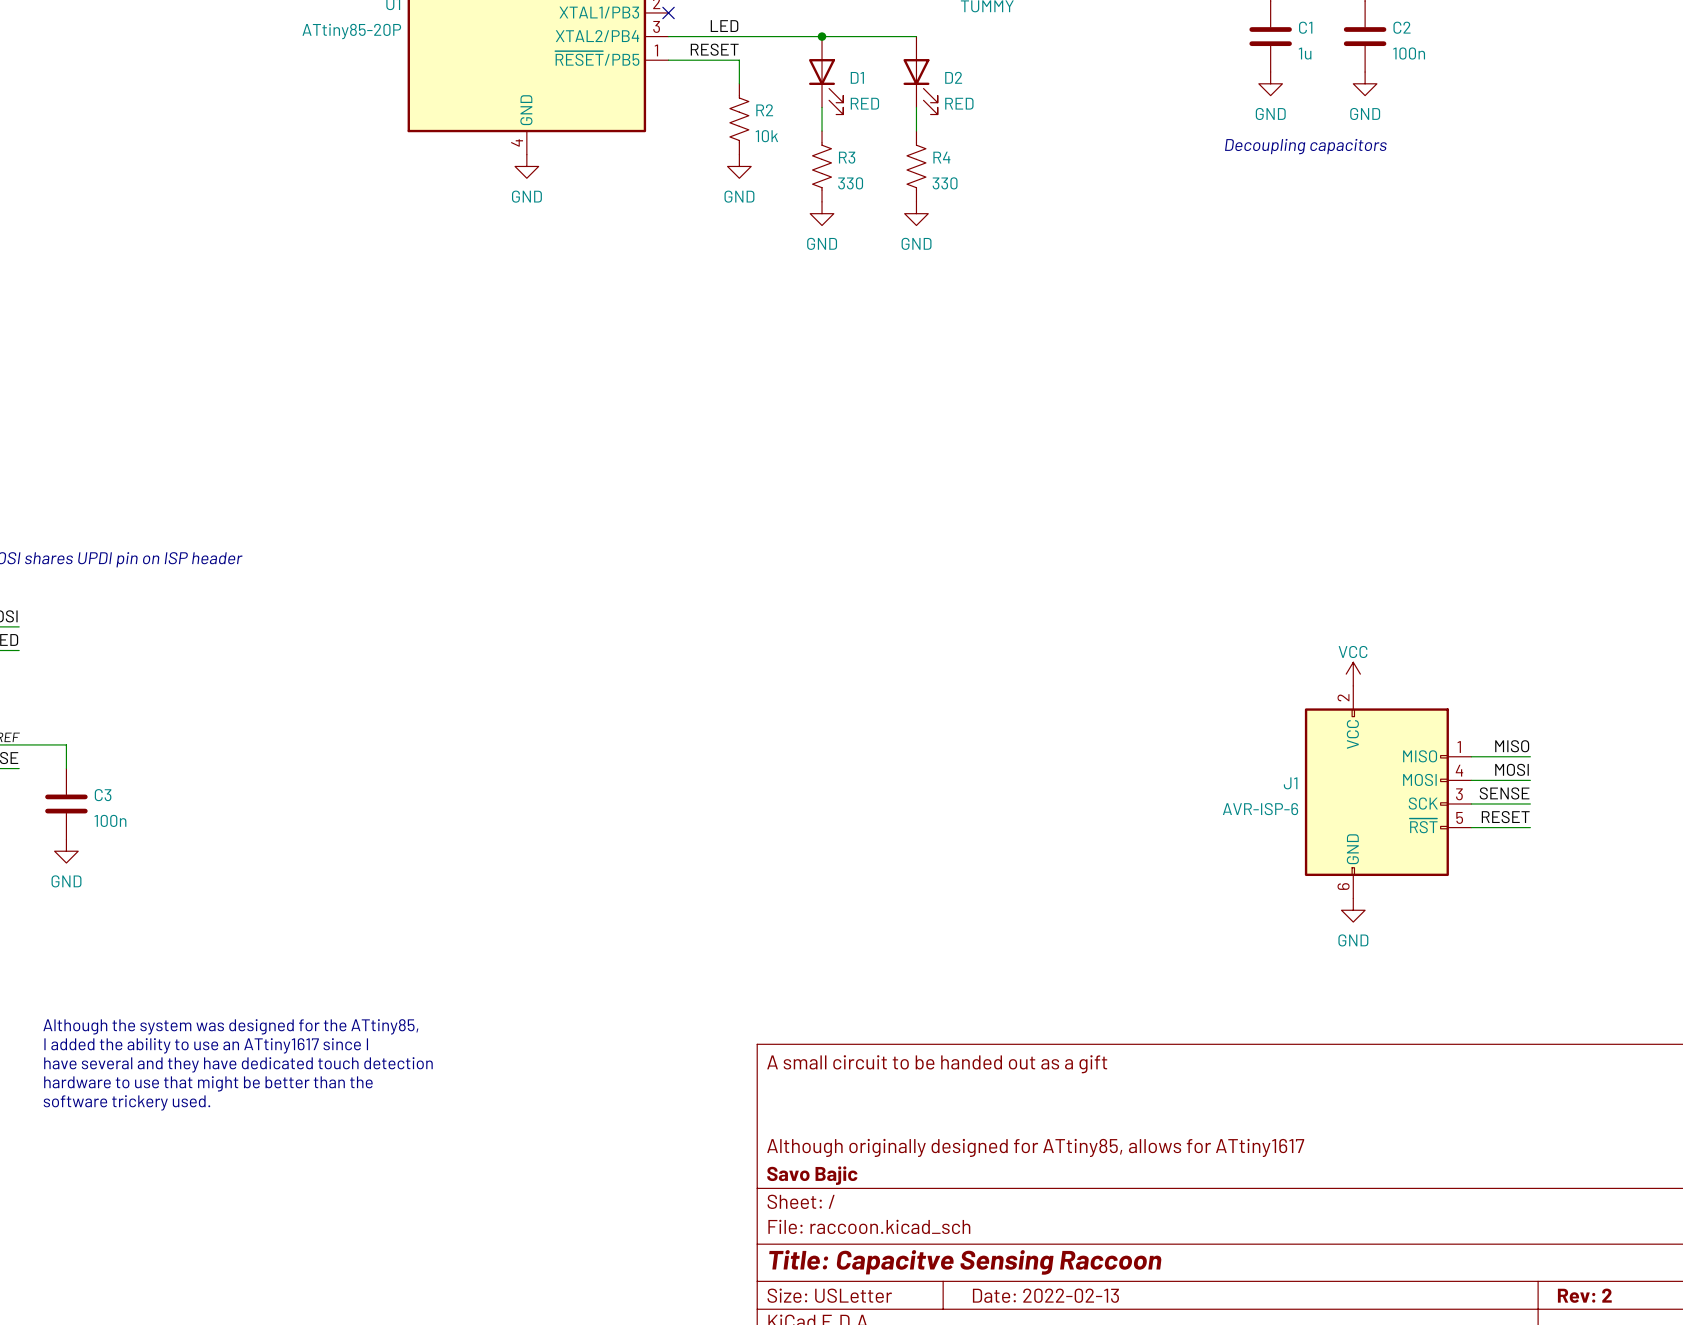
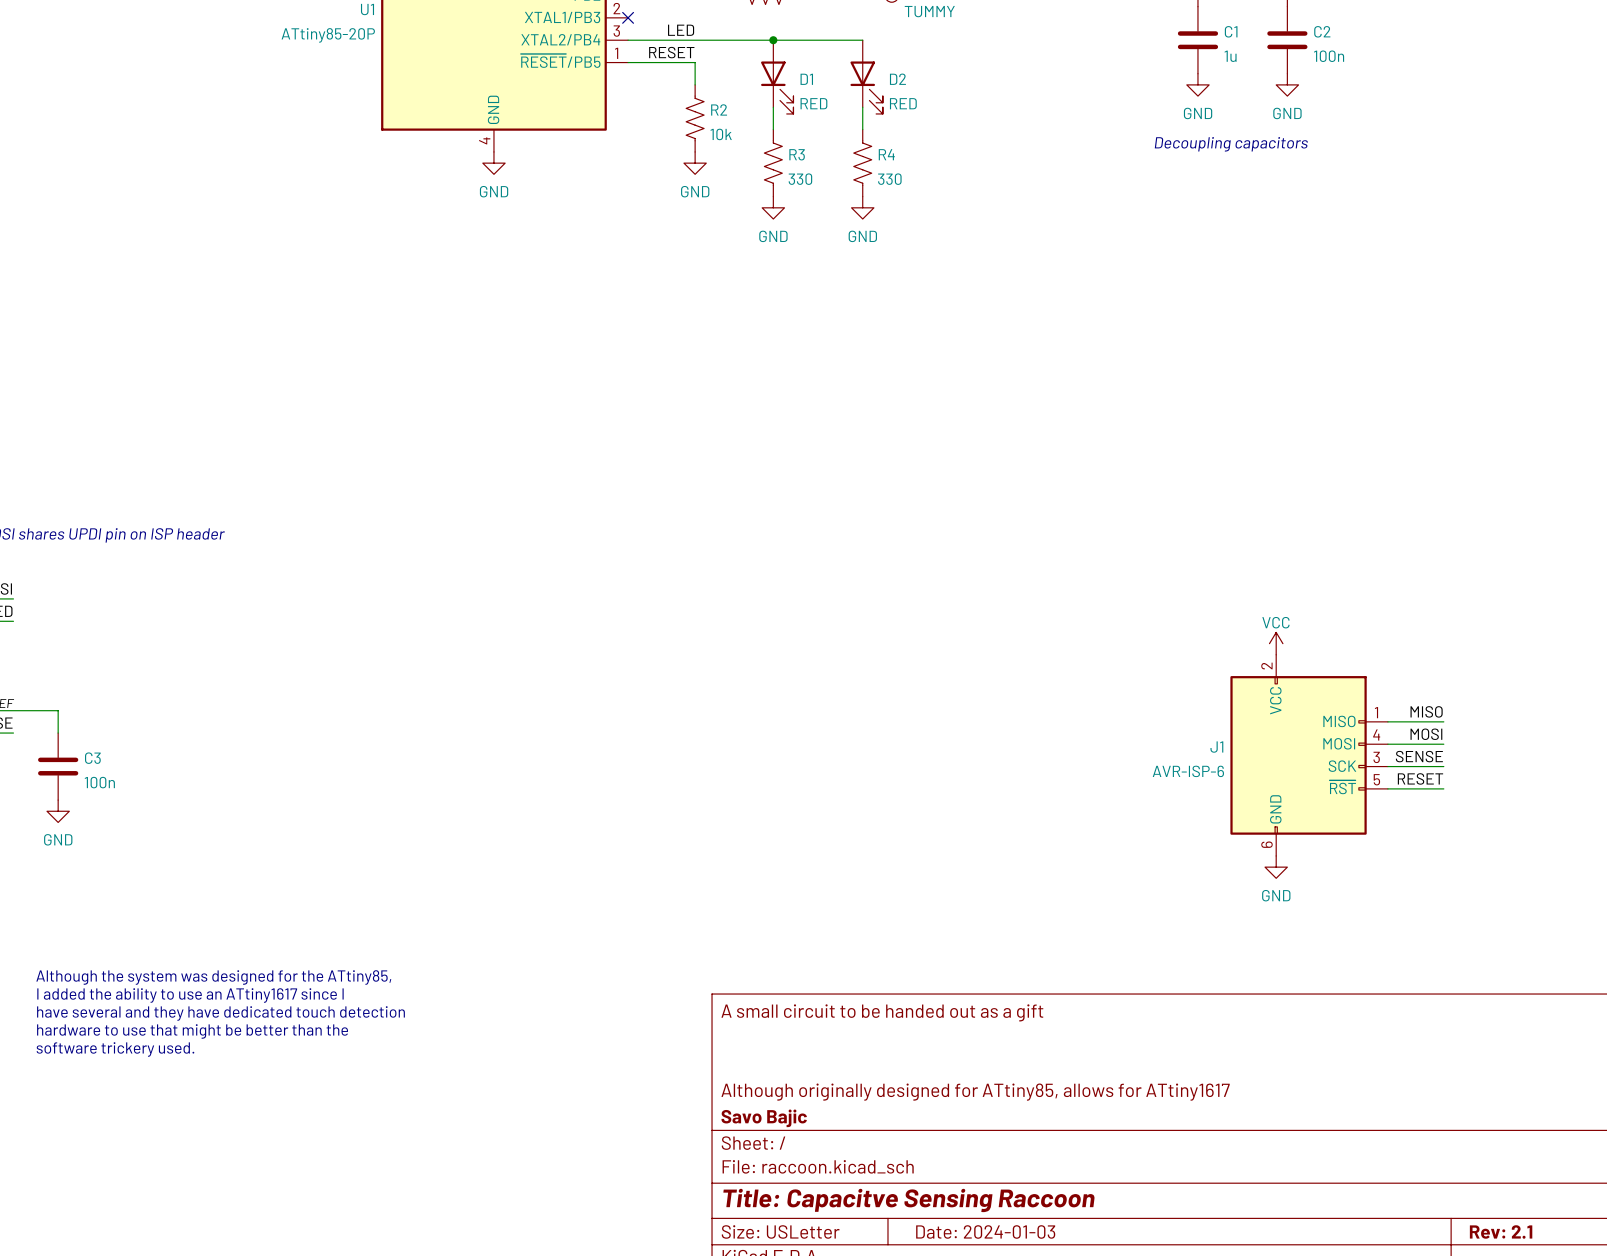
title block: Date: 2022-02-13 (1045, 1295) -> Date: 2024-01-03 (985, 1231)
title block: Rev: 2 (1584, 1295) -> Rev: 2.1 (1501, 1231)

